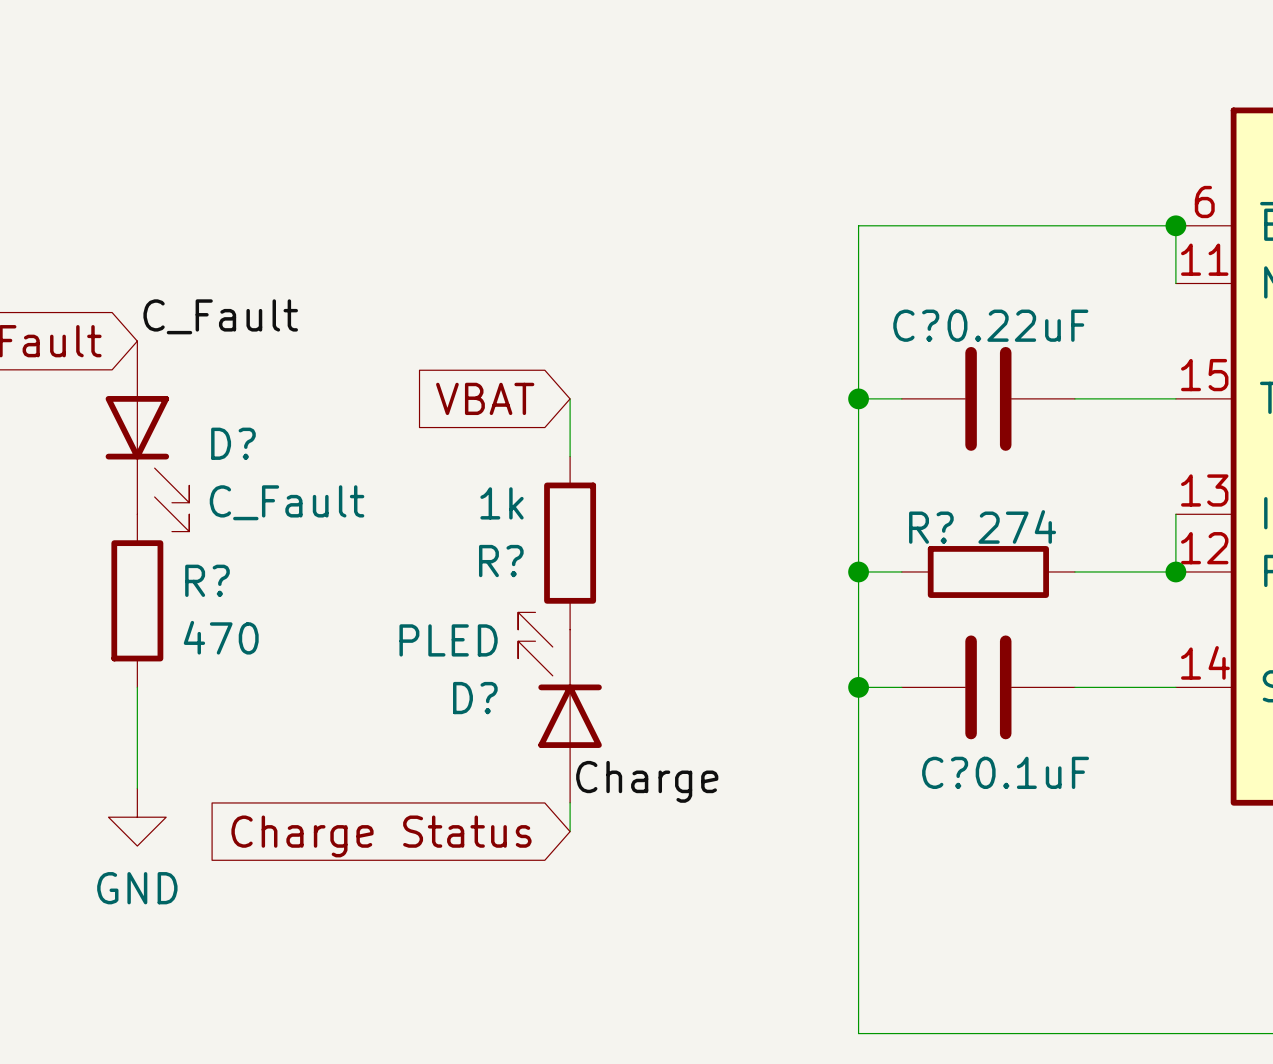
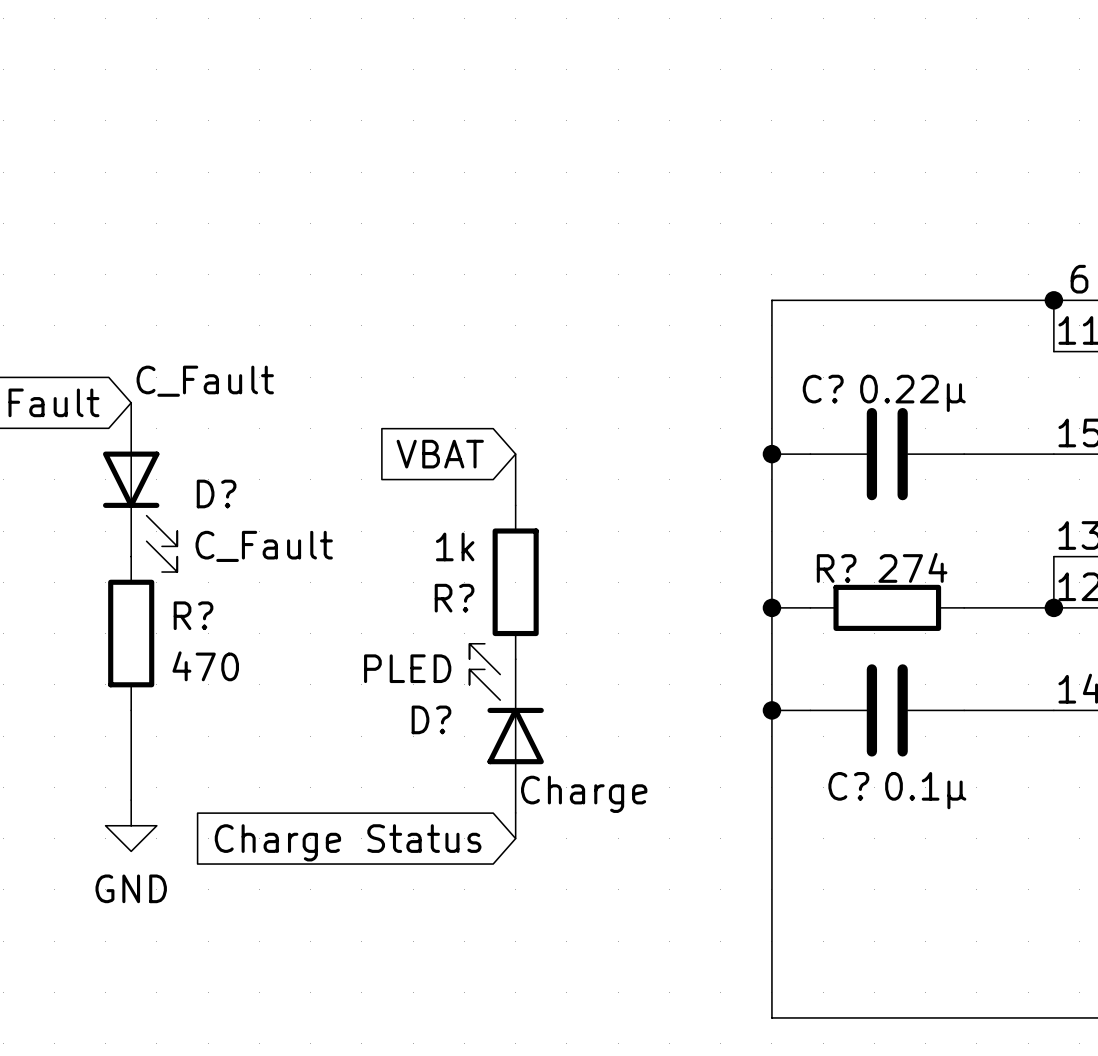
C? value: 0.22uF (1017, 325) -> 0.22µ (912, 393)
C? value: 0.1uF (1032, 772) -> 0.1µ (925, 790)

